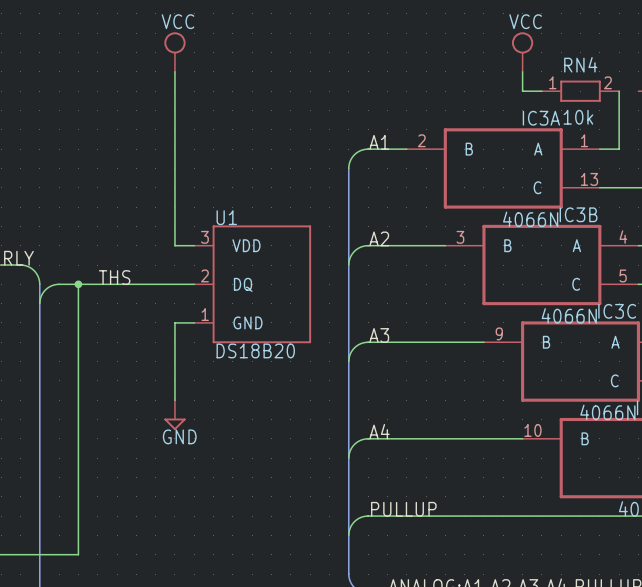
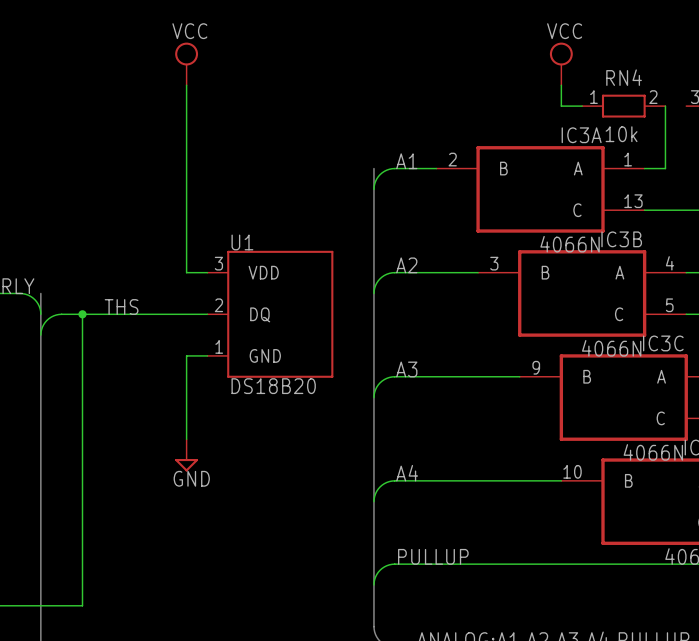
bus: none -> (373, 168) (373, 189)
bus: none -> (40, 293) (40, 314)

